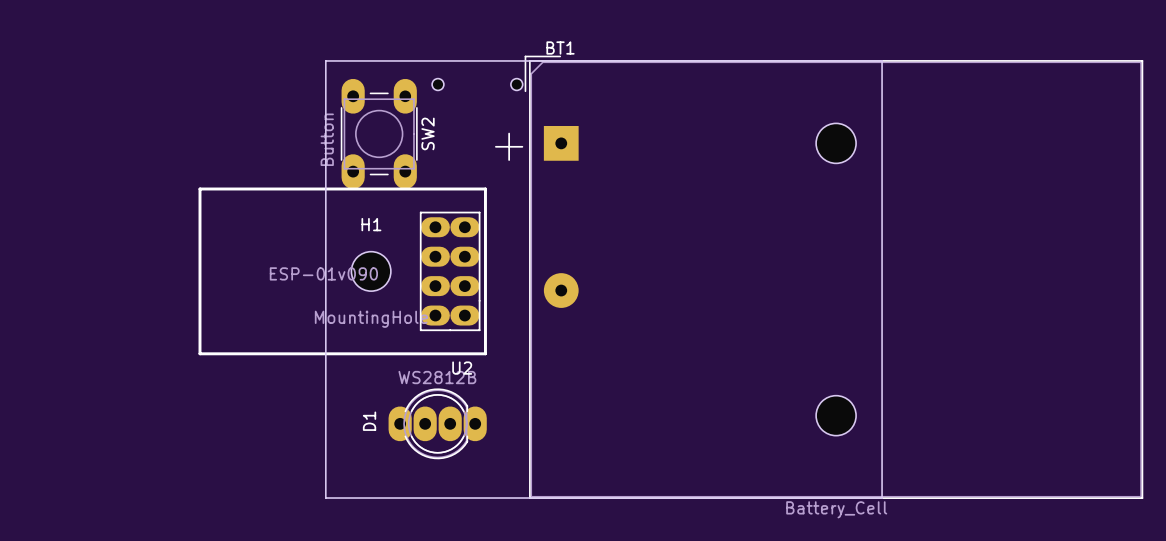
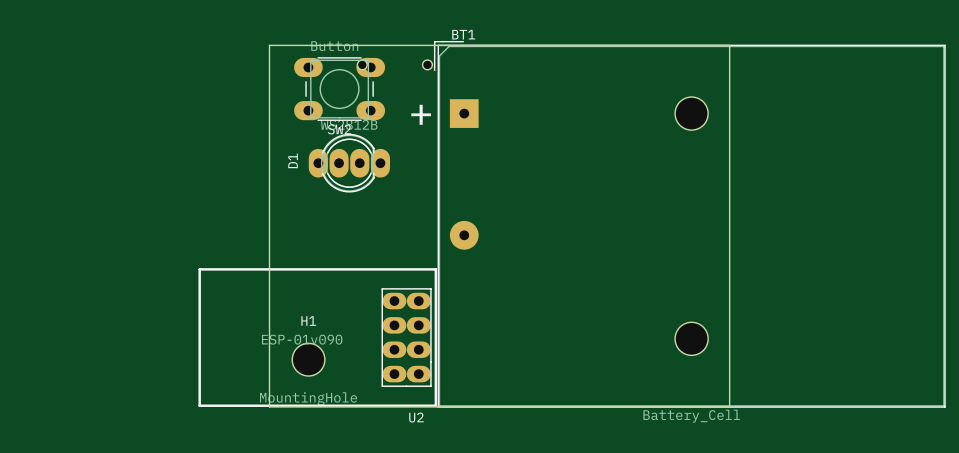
SW2 rotation: 0° (379, 133) -> 90° clockwise (339, 89)
U2 position: (342, 271) -> (317, 337)
H1 position: (371, 271) -> (308, 359)
D1 position: (437, 423) -> (349, 163)

